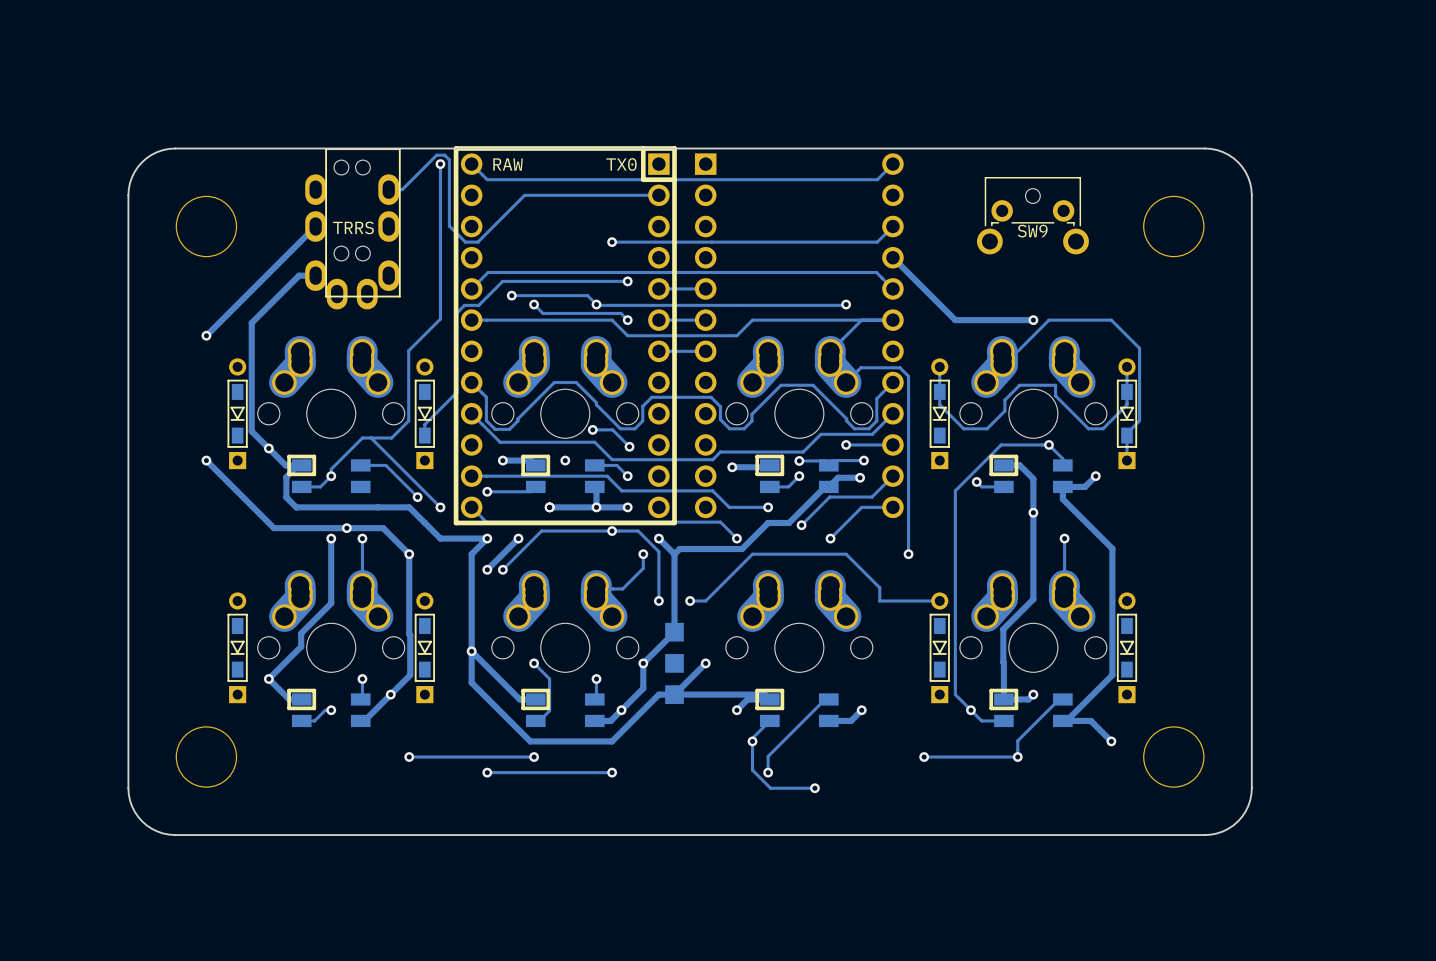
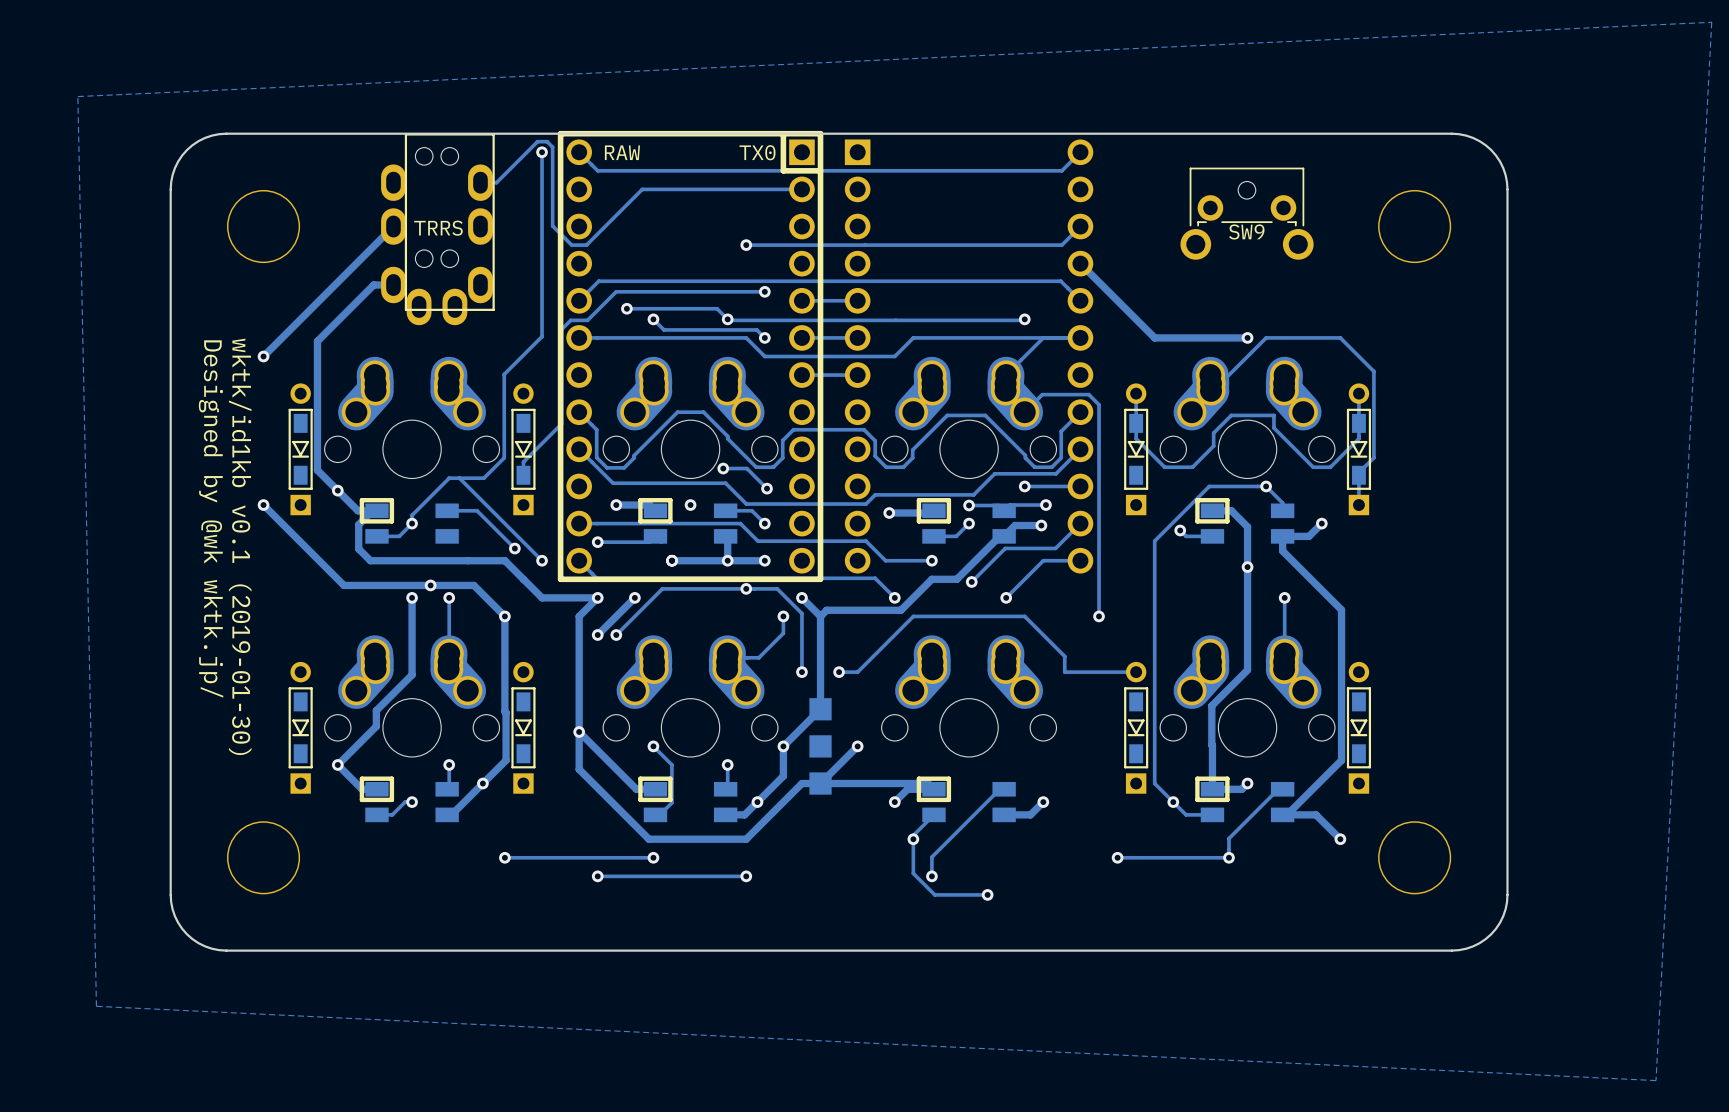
zone outline: none -> (1711, 22) (77, 96) (96, 1006) (1656, 1080) (1711, 22)
text: none -> Designed by @wk wktk.jp/ (211, 518)
text: none -> wktk/id1kb v0.1 (2019-01-30) (240, 546)

